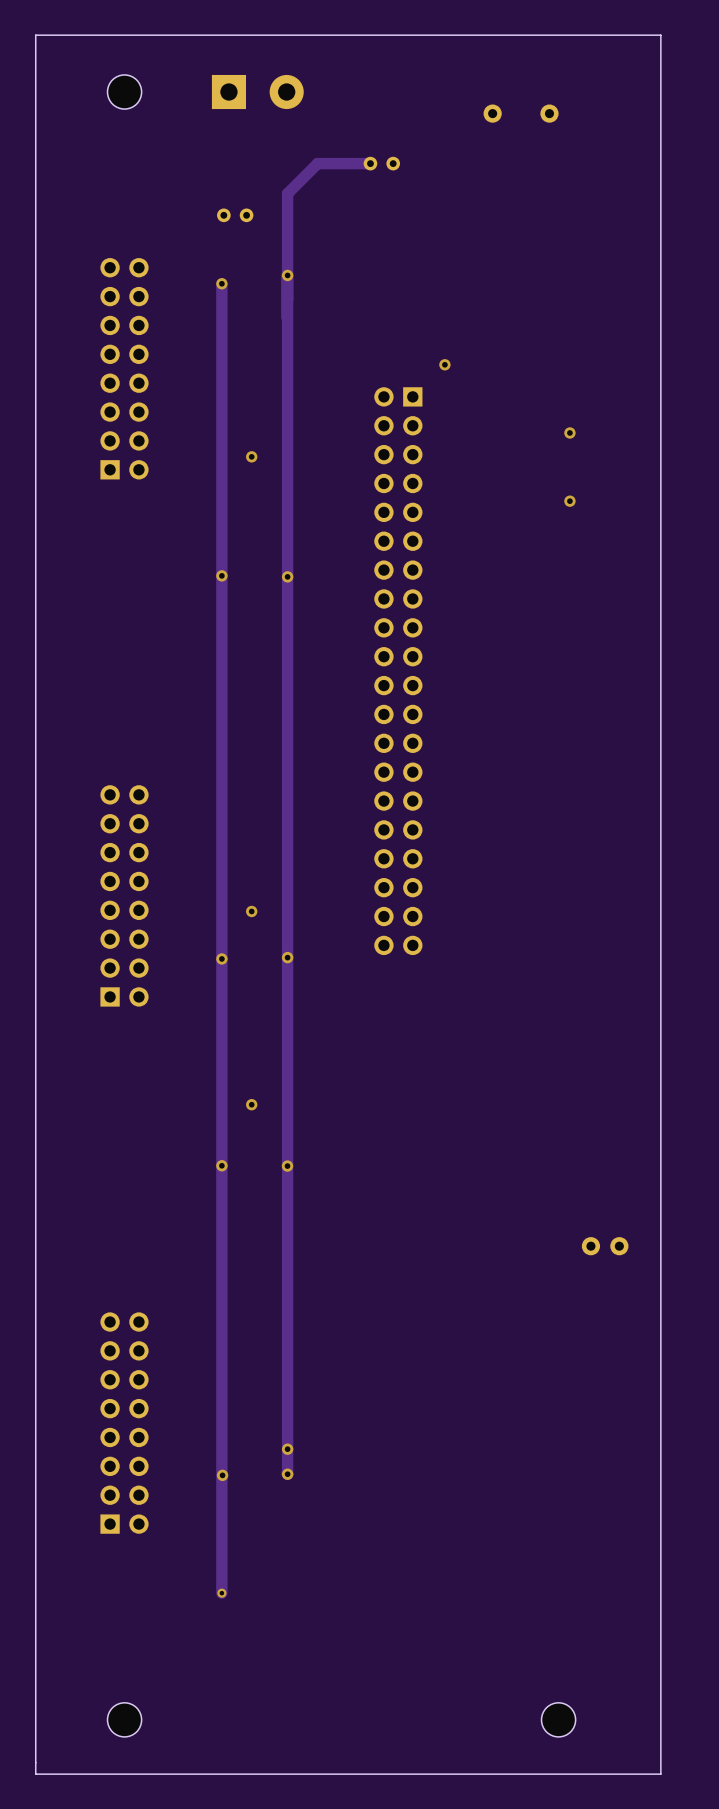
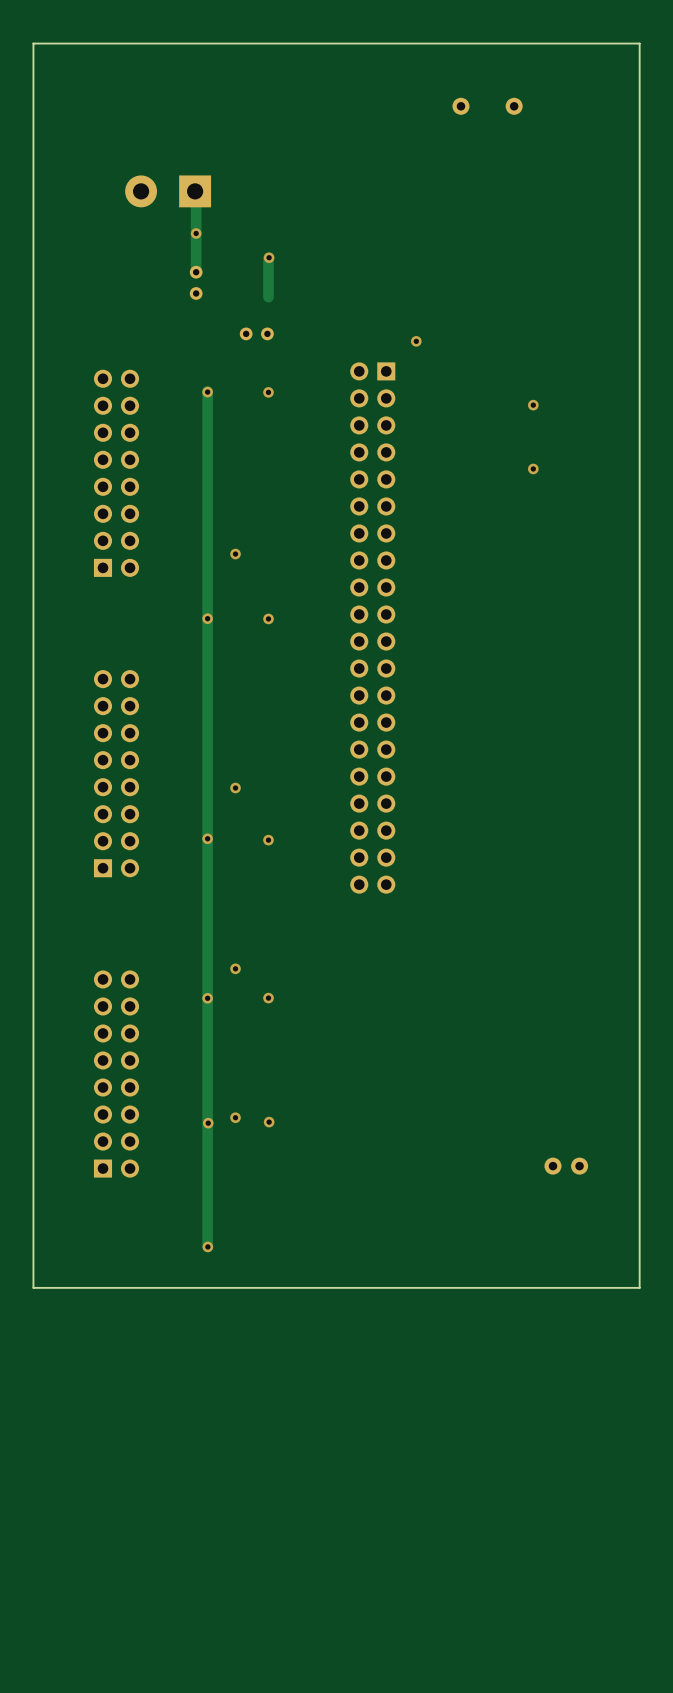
board edge: (35, 46) (35, 35) (660, 35) (660, 1774) (35, 1774) (35, 1376) -> (33, 43) (639, 43) (639, 1287) (33, 1287)
part: (124, 92) -> none
part rotation: 0° (257, 92) -> 180° (168, 191)
part position: (257, 92) -> (168, 191)
track: (370, 163) (317, 163) (287, 193) (287, 1474) -> none
part: (381, 163) -> none
track: none -> (195, 191) (196, 272)
part: (235, 215) -> none
track: (221, 283) (221, 418) -> none
via position: (221, 283) -> (196, 233)
part: none -> (196, 282)
part: none -> (256, 333)
part position: (124, 368) -> (116, 473)
via: none -> (207, 392)
via: none -> (268, 392)
via: (251, 456) -> none
via: (221, 575) -> none
via: (287, 576) -> none
via: none -> (235, 554)
via: none -> (207, 618)
via: none -> (268, 618)
via: none -> (235, 788)
part position: (124, 895) -> (116, 773)
via: none -> (207, 838)
via: none -> (268, 840)
via: (251, 911) -> none
via: (287, 957) -> none
via: (221, 958) -> none
via: none -> (235, 968)
via: none -> (207, 998)
via: none -> (268, 998)
via: (251, 1104) -> none
part: none -> (116, 1074)
via: (221, 1165) -> none
via: (287, 1166) -> none
via: none -> (235, 1117)
via: none -> (269, 1122)
via: none -> (208, 1123)
track: (221, 1332) (221, 1593) -> none
via: none -> (207, 1246)
part: (124, 1423) -> none
via: (287, 1449) -> none
via: (287, 1474) -> none
via: (222, 1475) -> none
via: (221, 1593) -> none
part: (124, 1719) -> none
part: (558, 1719) -> none

